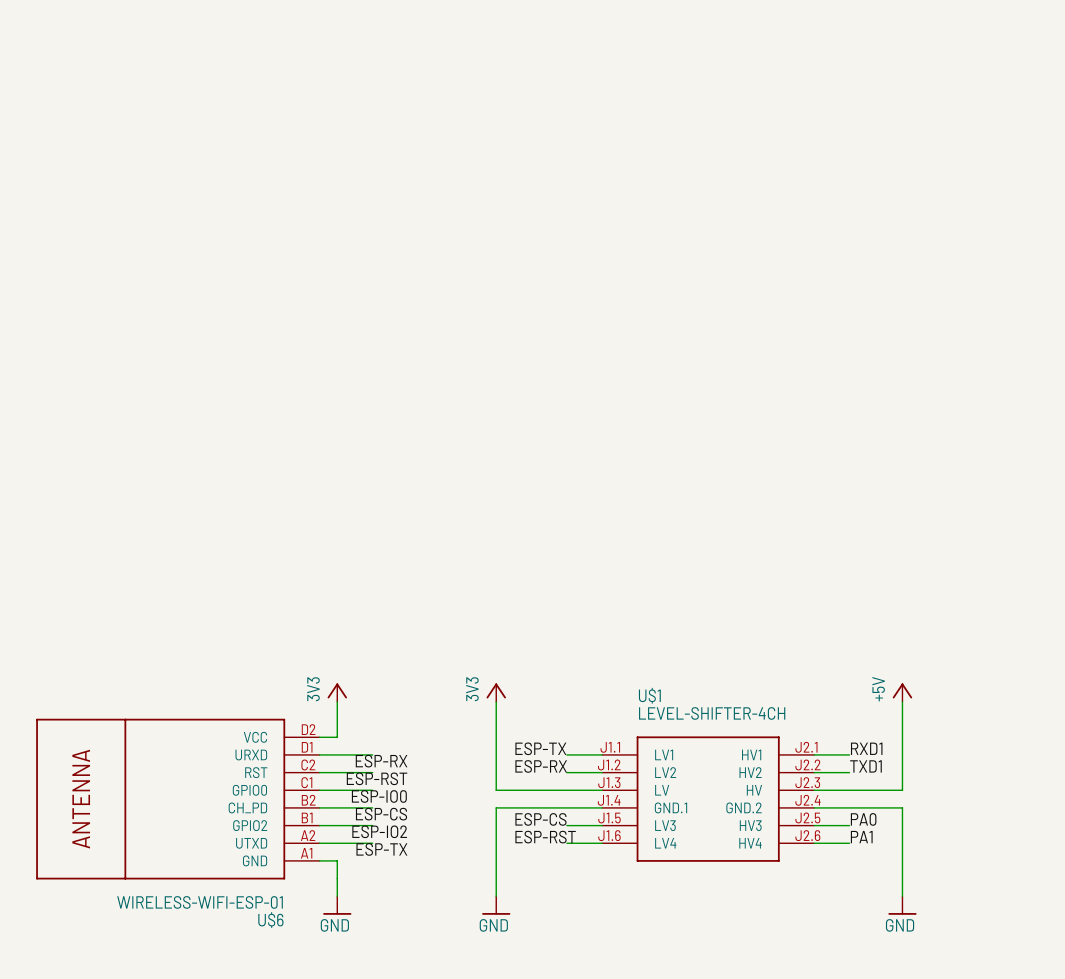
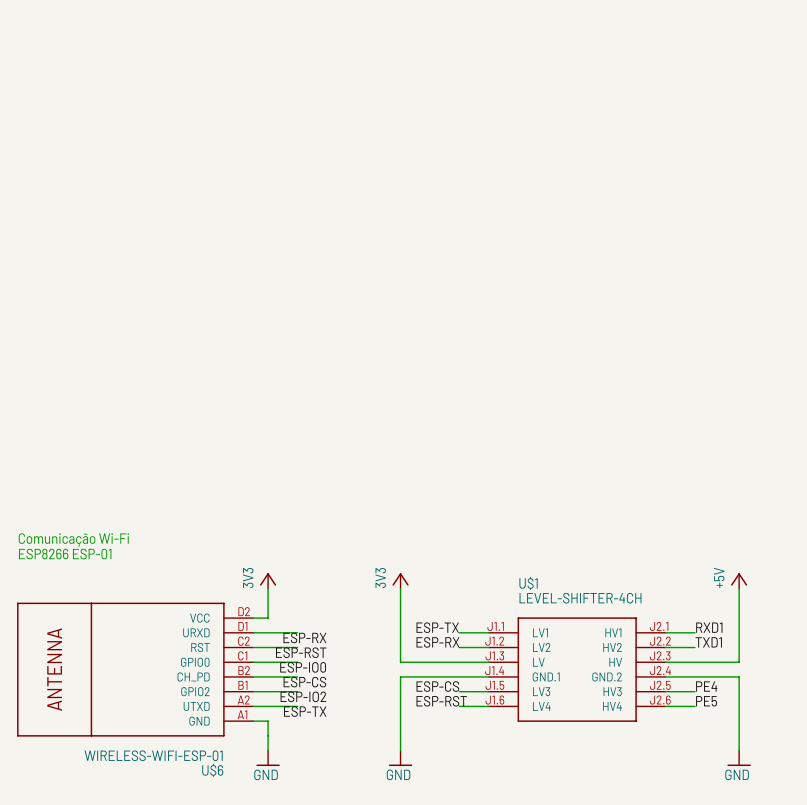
text: none -> Comunicação Wi-Fi (73, 539)
text: none -> ESP8266 ESP-01 (65, 554)
label: PA0 (863, 819) -> PE4 (706, 686)
label: PA1 (861, 837) -> PE5 (706, 701)

